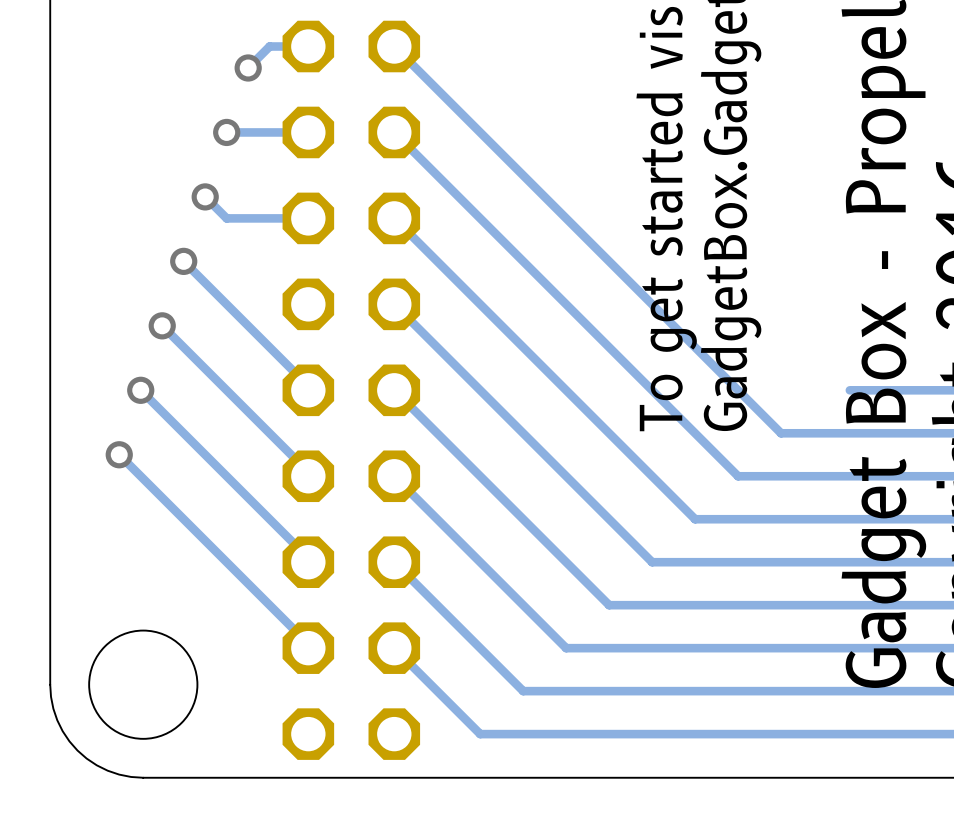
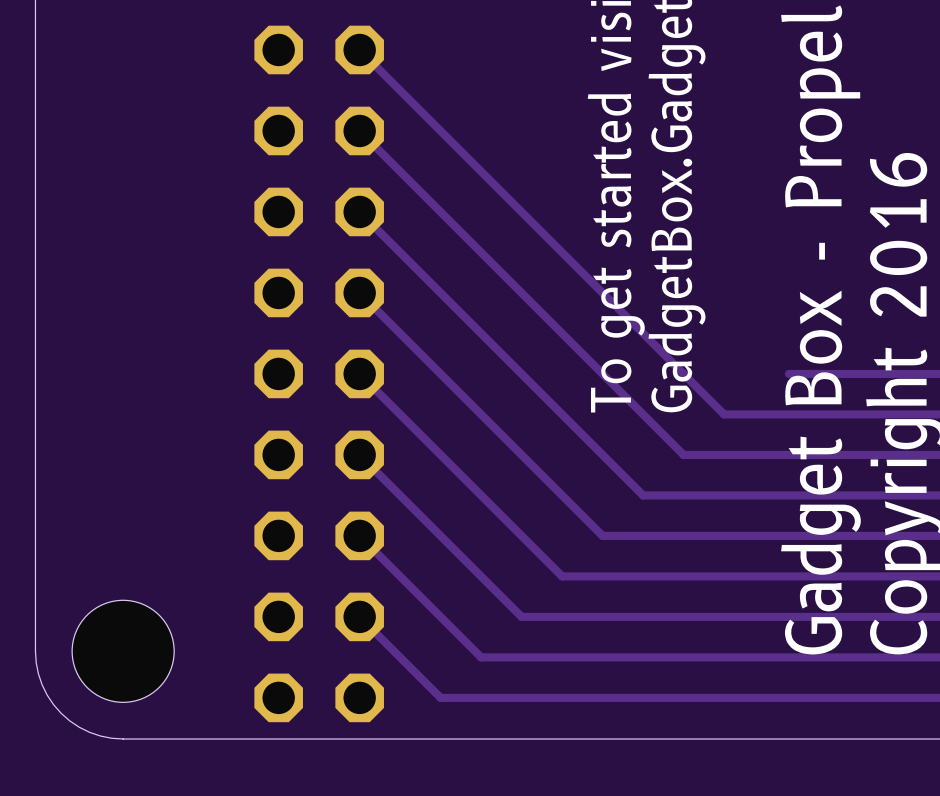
track: (308, 46) (269, 46) (248, 67) -> none
via: (248, 67) -> none
via: (226, 132) -> none
track: (308, 132) (226, 132) -> none
track: (205, 196) (226, 218) (308, 218) -> none
via: (205, 196) -> none
track: (183, 261) (308, 386) (308, 390) -> none
via: (183, 261) -> none
track: (162, 325) (308, 471) (308, 476) -> none
via: (162, 325) -> none
track: (140, 390) (308, 557) (308, 562) -> none
via: (140, 390) -> none
track: (119, 454) (308, 643) (308, 648) -> none
via: (119, 454) -> none

